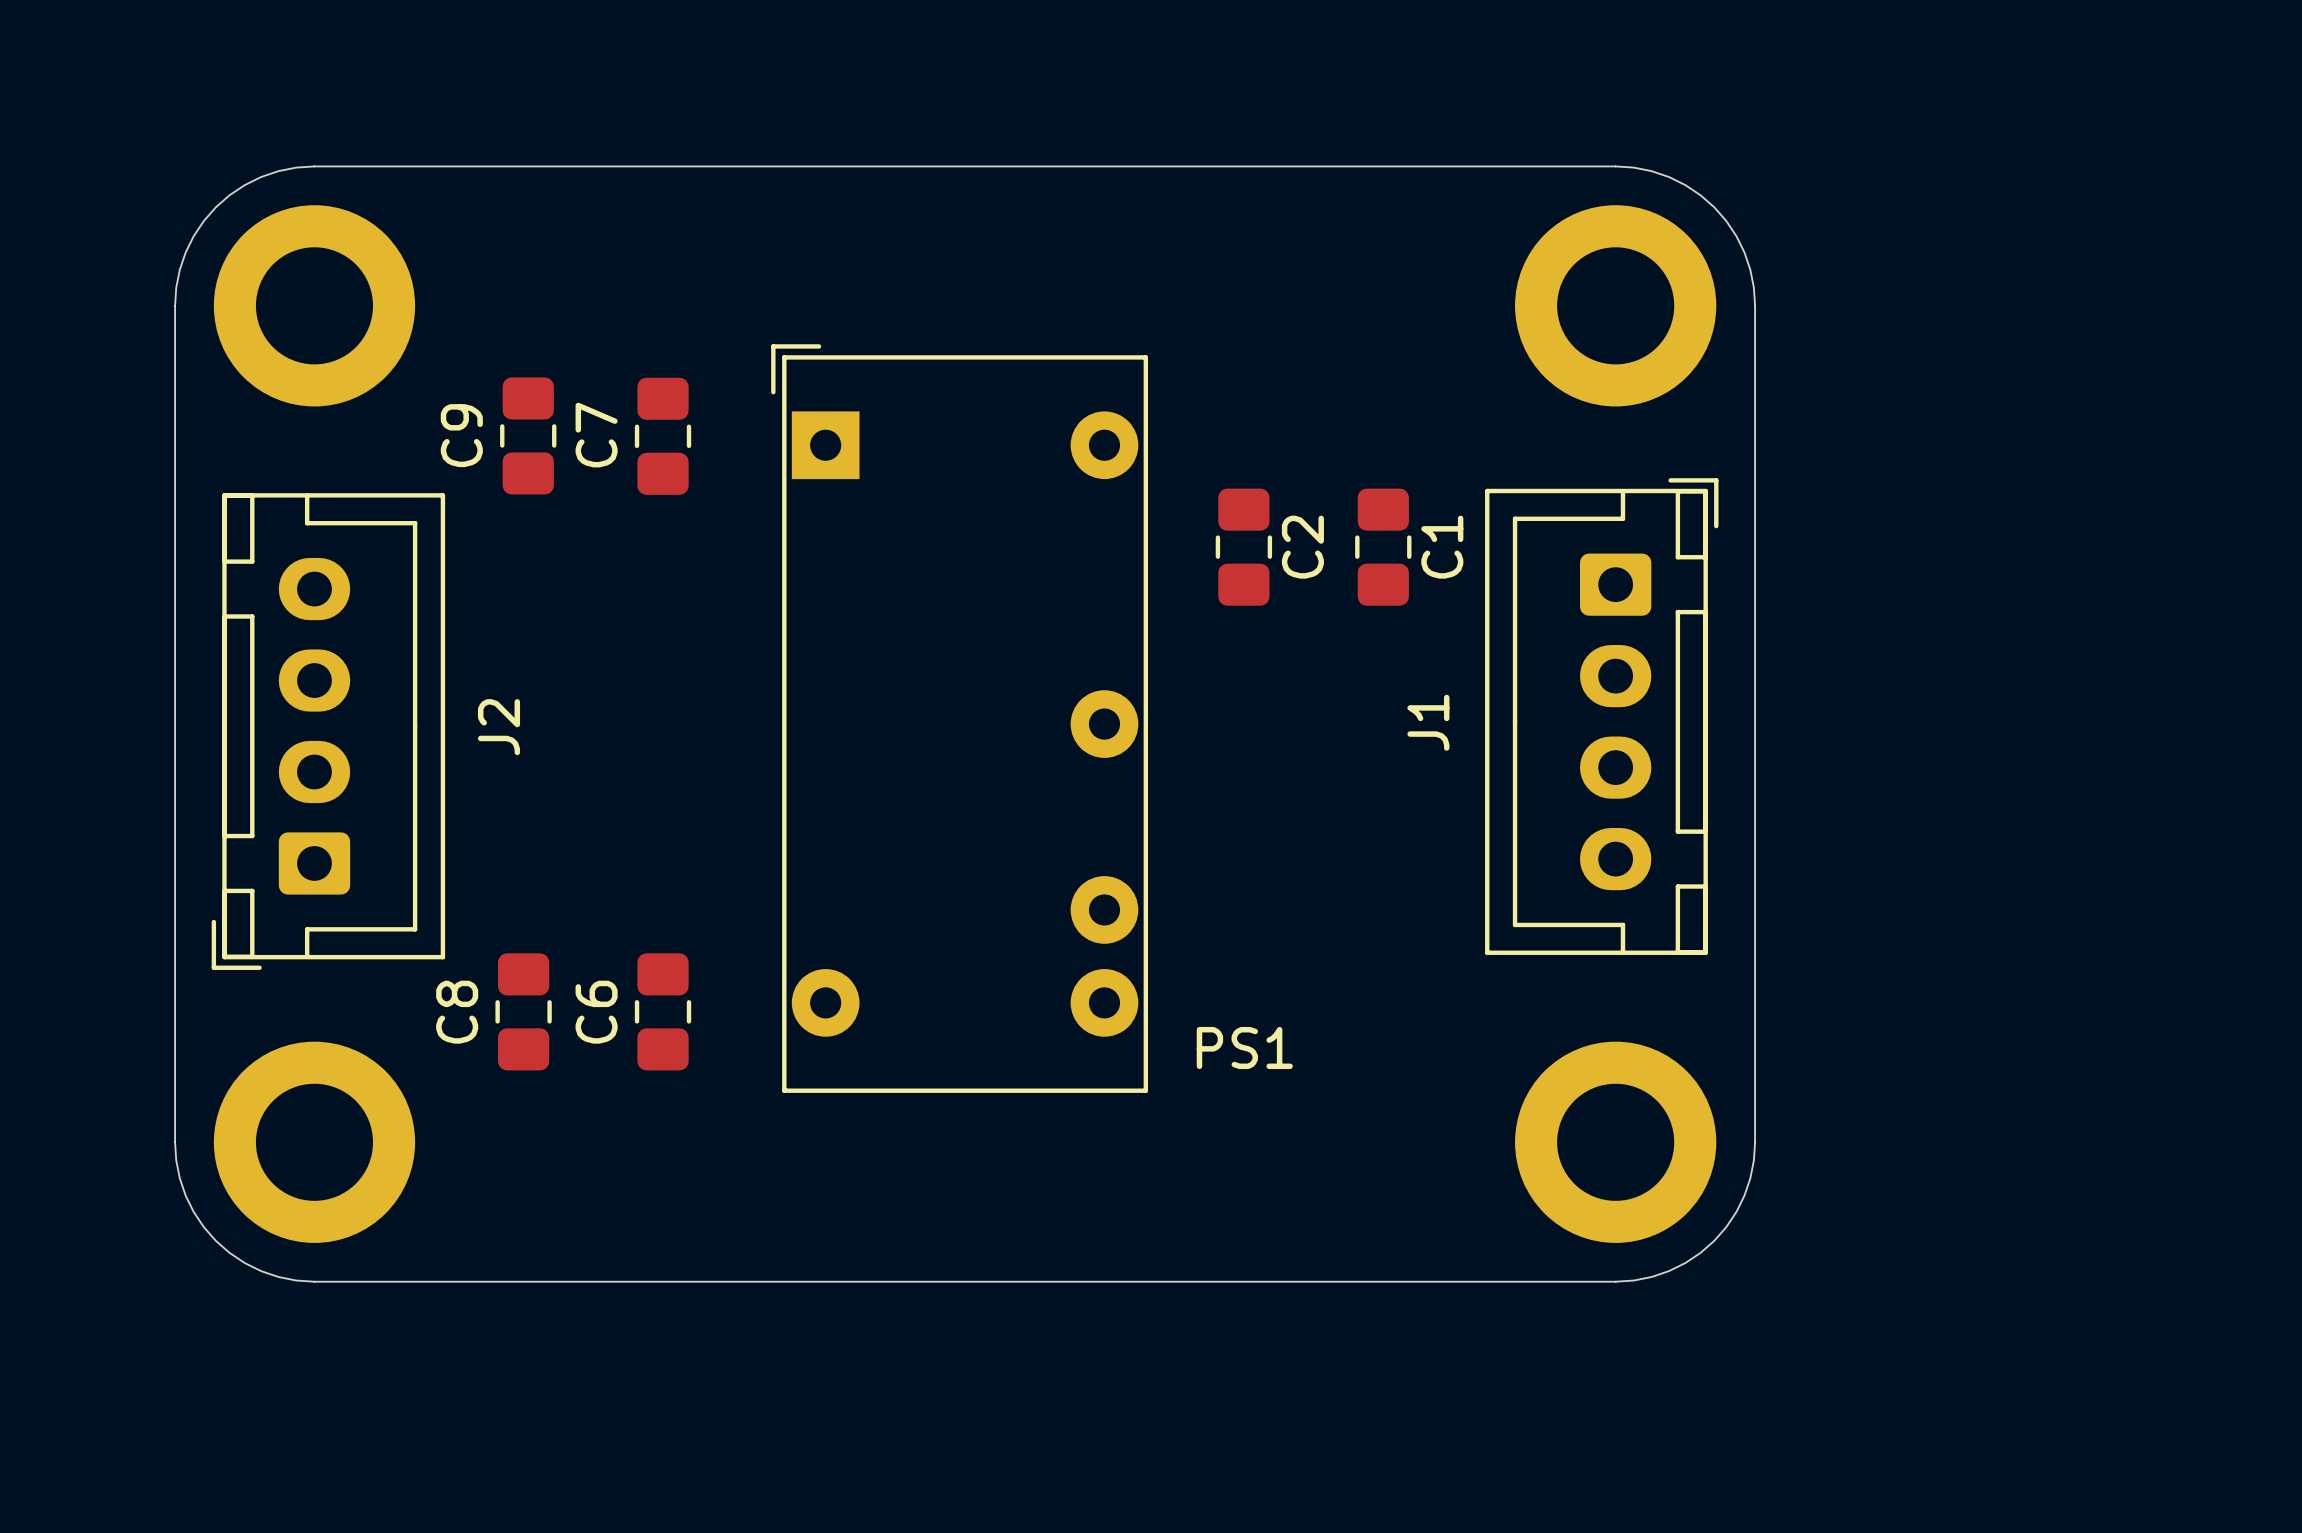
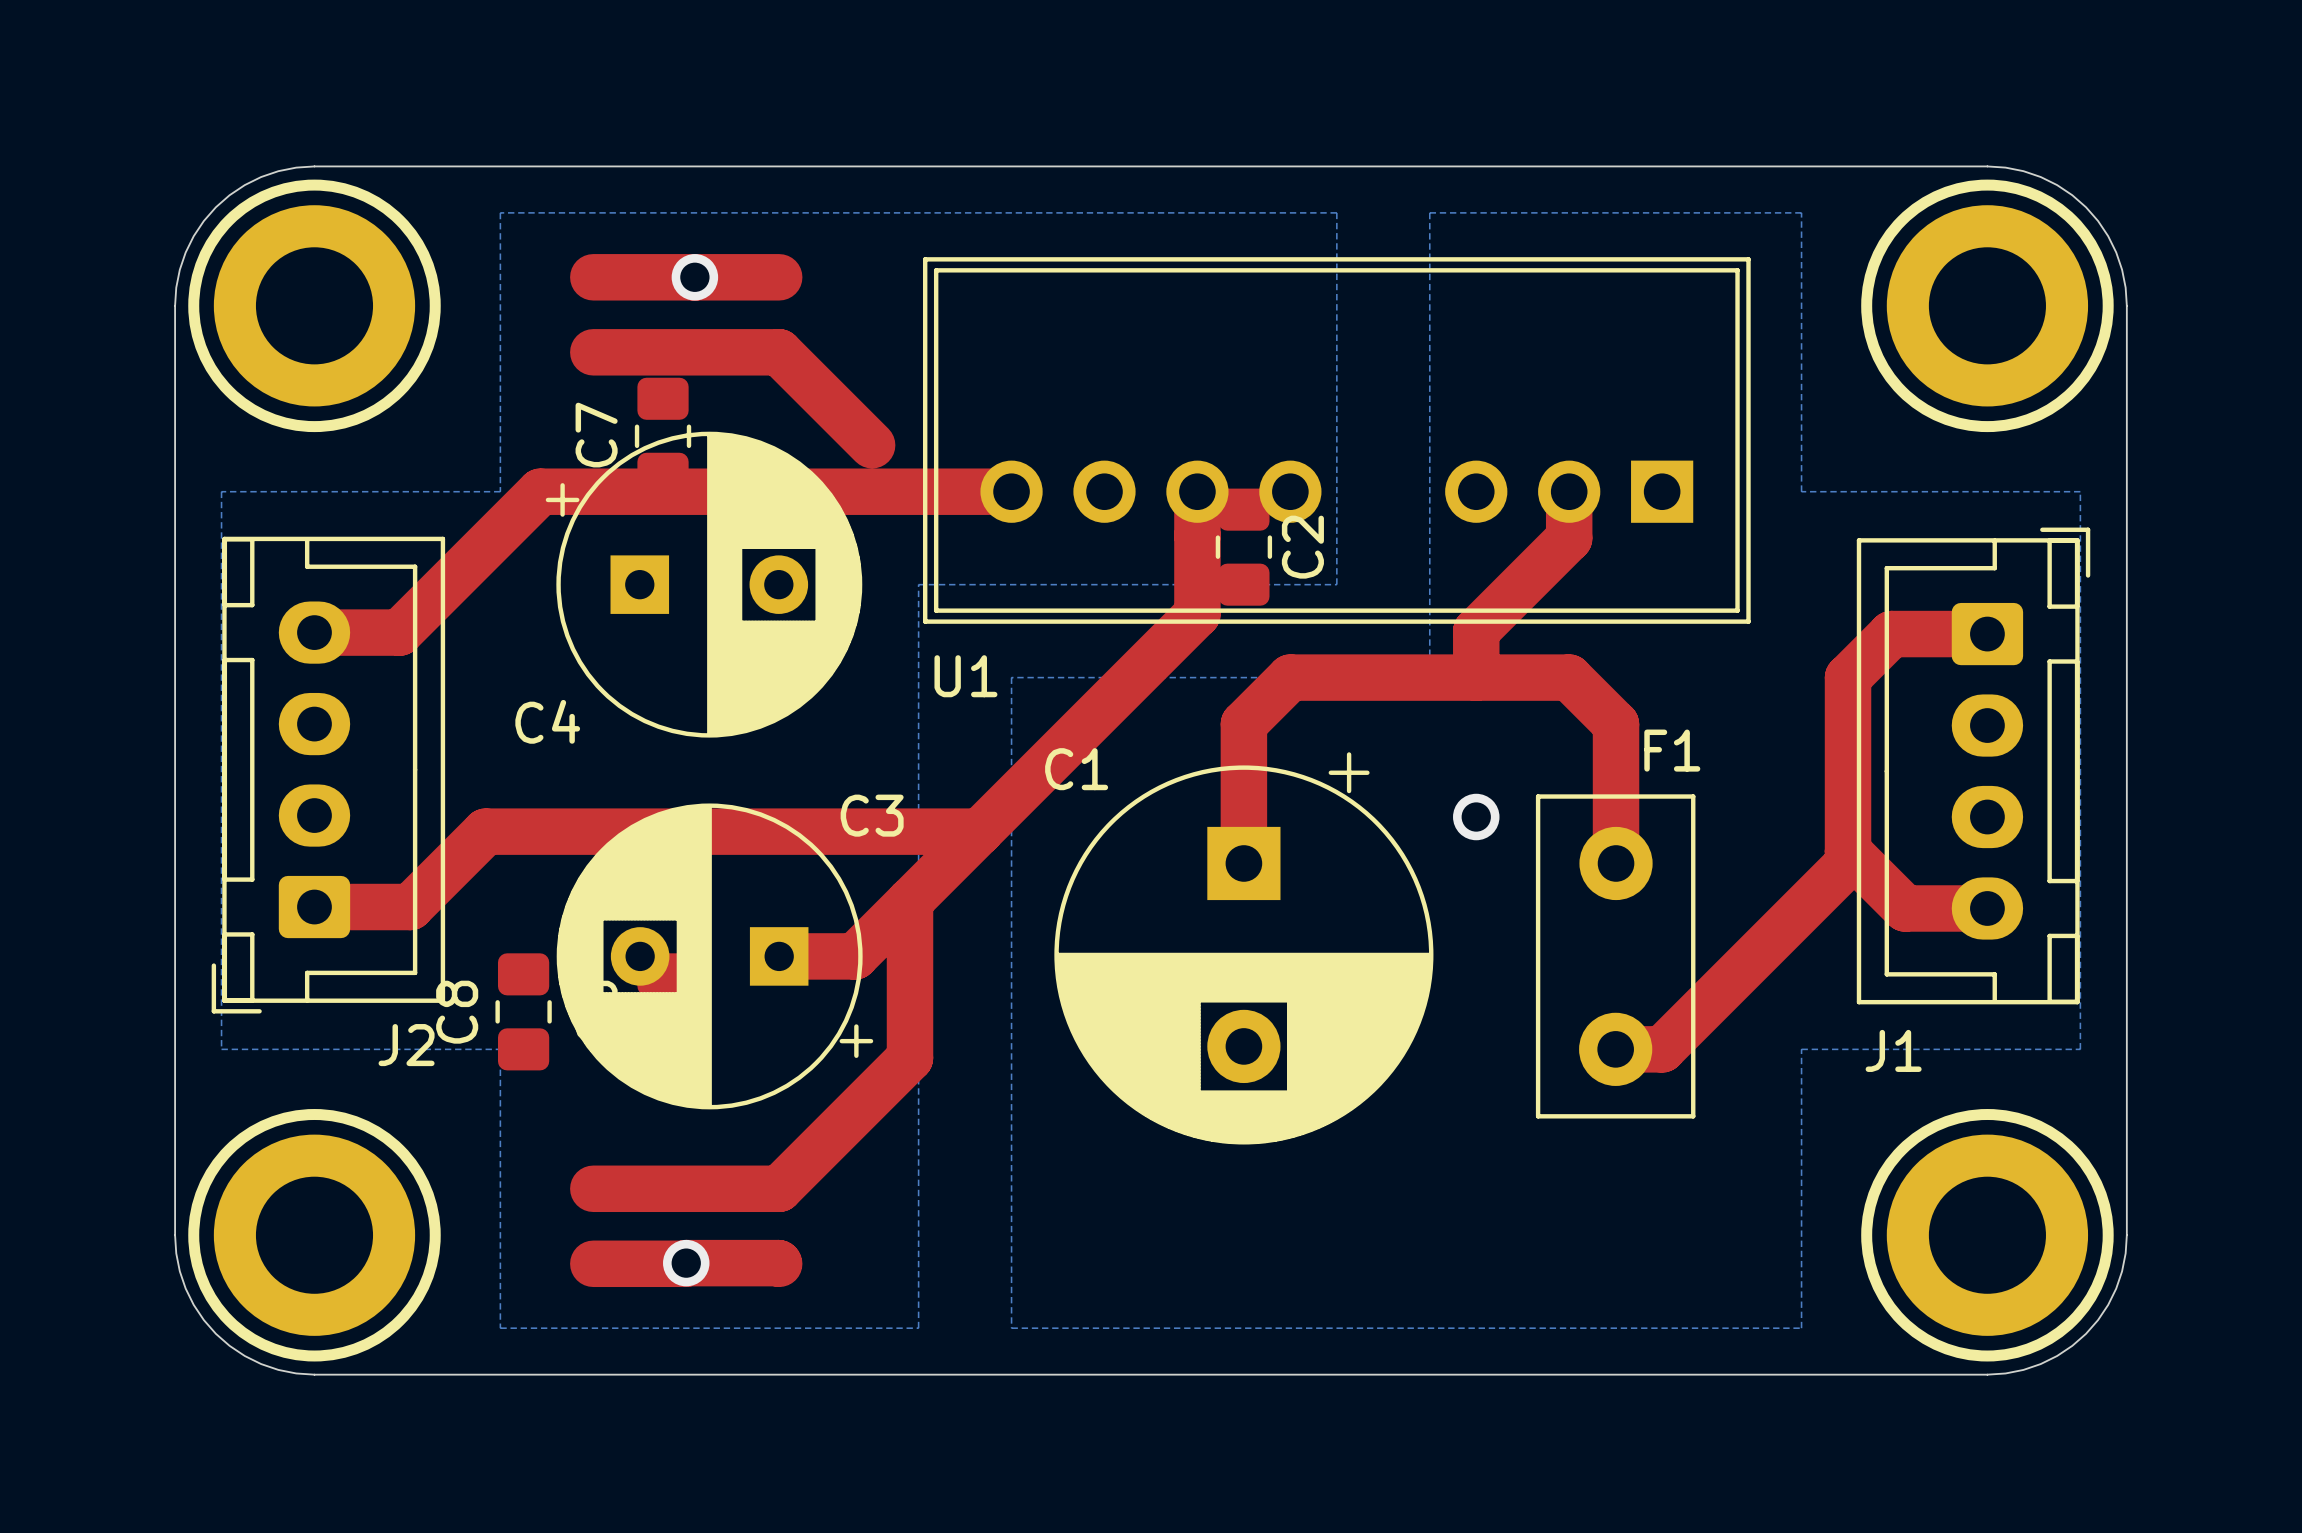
board edge: (1615, 166) (1633, 167) (1669, 177) (1685, 185) (1714, 207) (1736, 236) (1750, 269) (1753, 287) (1755, 1142) (1750, 1178) (1736, 1212) (1714, 1240) (1700, 1252) (1669, 1271) (1633, 1280) (1615, 1281) (296, 1280) (261, 1271) (244, 1263) (215, 1240) (193, 1212) (185, 1195) (176, 1160) (175, 1142) -> (1615, 166) (2005, 167) (2040, 177) (2072, 195) (2098, 220) (2116, 252) (2125, 287) (2126, 305) (2126, 1235) (2122, 1271) (2108, 1304) (2086, 1333) (2072, 1345) (2040, 1364) (2005, 1373) (1987, 1374) (296, 1373) (261, 1364) (244, 1355) (215, 1333) (193, 1304) (185, 1288) (176, 1253) (175, 1142)
drawing: none -> [188, 179, 441, 433]
drawing: none -> [1861, 179, 2114, 433]
bottom zone outline: none -> (500, 212) (500, 491) (221, 491) (221, 1049) (500, 1049) (500, 1328) (918, 1328) (918, 584) (1336, 584) (1336, 212) (500, 212)
bottom zone outline: none -> (1429, 212) (1801, 212) (1801, 491) (2080, 491) (2080, 1049) (1801, 1049) (1801, 1328) (1011, 1328) (1011, 677) (1429, 677) (1429, 212)
top track: none -> (593, 277) (779, 277)
via: none -> (694, 277)
part position: (1615, 305) -> (1987, 305)
top track: none -> (593, 352) (779, 352) (872, 445)
C9: (528, 435) -> none
U1: none -> (1336, 440)
C1 footprint: [1355, 488, 1412, 606] -> [1054, 752, 1434, 1145]
top track: none -> (1011, 491) (540, 491) (399, 632) (314, 632)
top track: none -> (1197, 491) (1197, 613) (854, 956) (779, 956)
top track: none -> (1569, 491) (1569, 538) (1476, 631) (1476, 677)
C1 name position: C1 (1442, 547) -> C1 (1076, 769)
C4: none -> (704, 584)
top track: none -> (1987, 634) (1891, 634) (1848, 677) (1848, 863) (1662, 1049) (1615, 1049)
J1 position: (1601, 716) -> (1973, 765)
PS1: (959, 718) -> none
J1 name rotation: 0° (1428, 722) -> 90° clockwise (1893, 1050)
J1 name position: J1 (1428, 722) -> J1 (1893, 1050)
J2 name rotation: 0° (499, 727) -> 90° clockwise (406, 1045)
J2 name position: J2 (499, 727) -> J2 (406, 1045)
J2 position: (328, 731) -> (328, 775)
via: none -> (1476, 817)
top track: none -> (979, 831) (485, 831) (410, 907) (314, 907)
top track: none -> (1848, 851) (1905, 908) (1987, 908)
top track: none -> (1243, 863) (1243, 724) (1290, 677) (1569, 677) (1616, 724) (1616, 863)
top track: none -> (910, 901) (910, 1057) (779, 1188) (593, 1188)
C3: none -> (714, 956)
F1: none -> (1615, 956)
drawing: none -> [188, 1109, 441, 1362]
drawing: none -> [1861, 1109, 2114, 1362]
part position: (314, 1142) -> (314, 1235)
part position: (1615, 1142) -> (1987, 1235)
top track: none -> (593, 1263) (779, 1263)
via: none -> (686, 1263)

